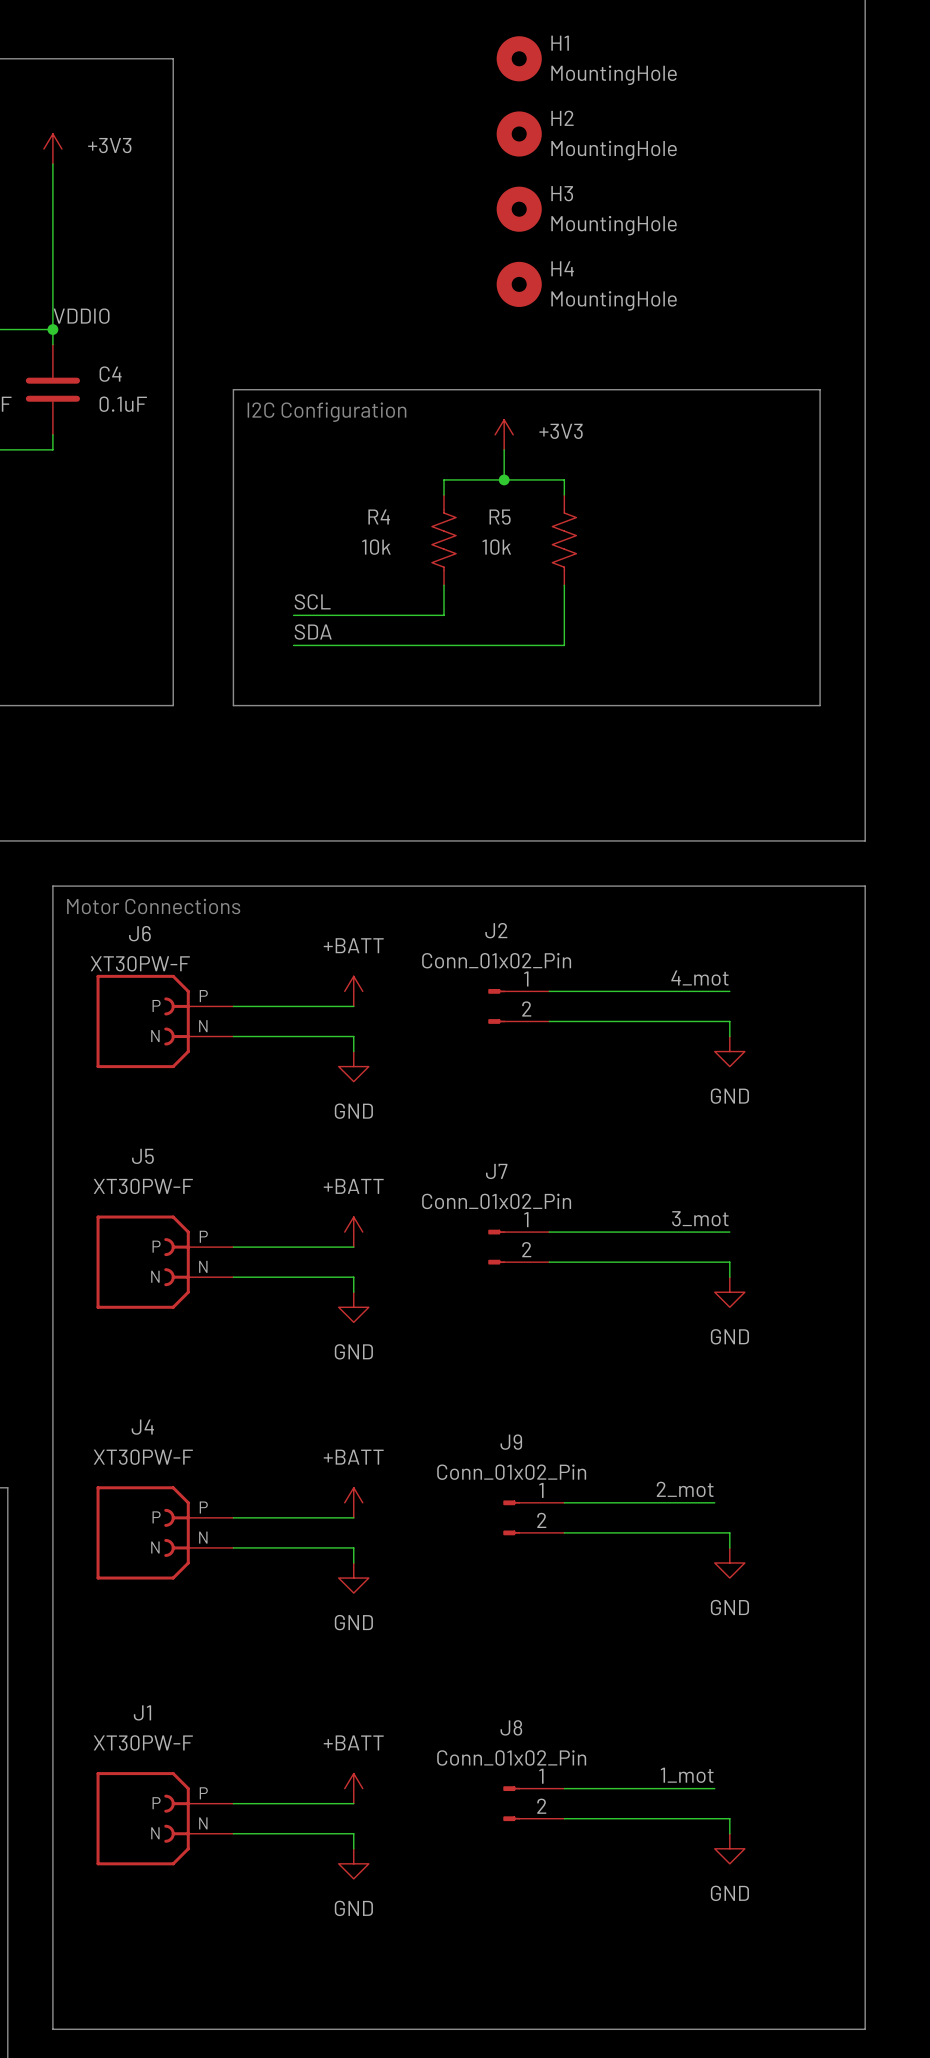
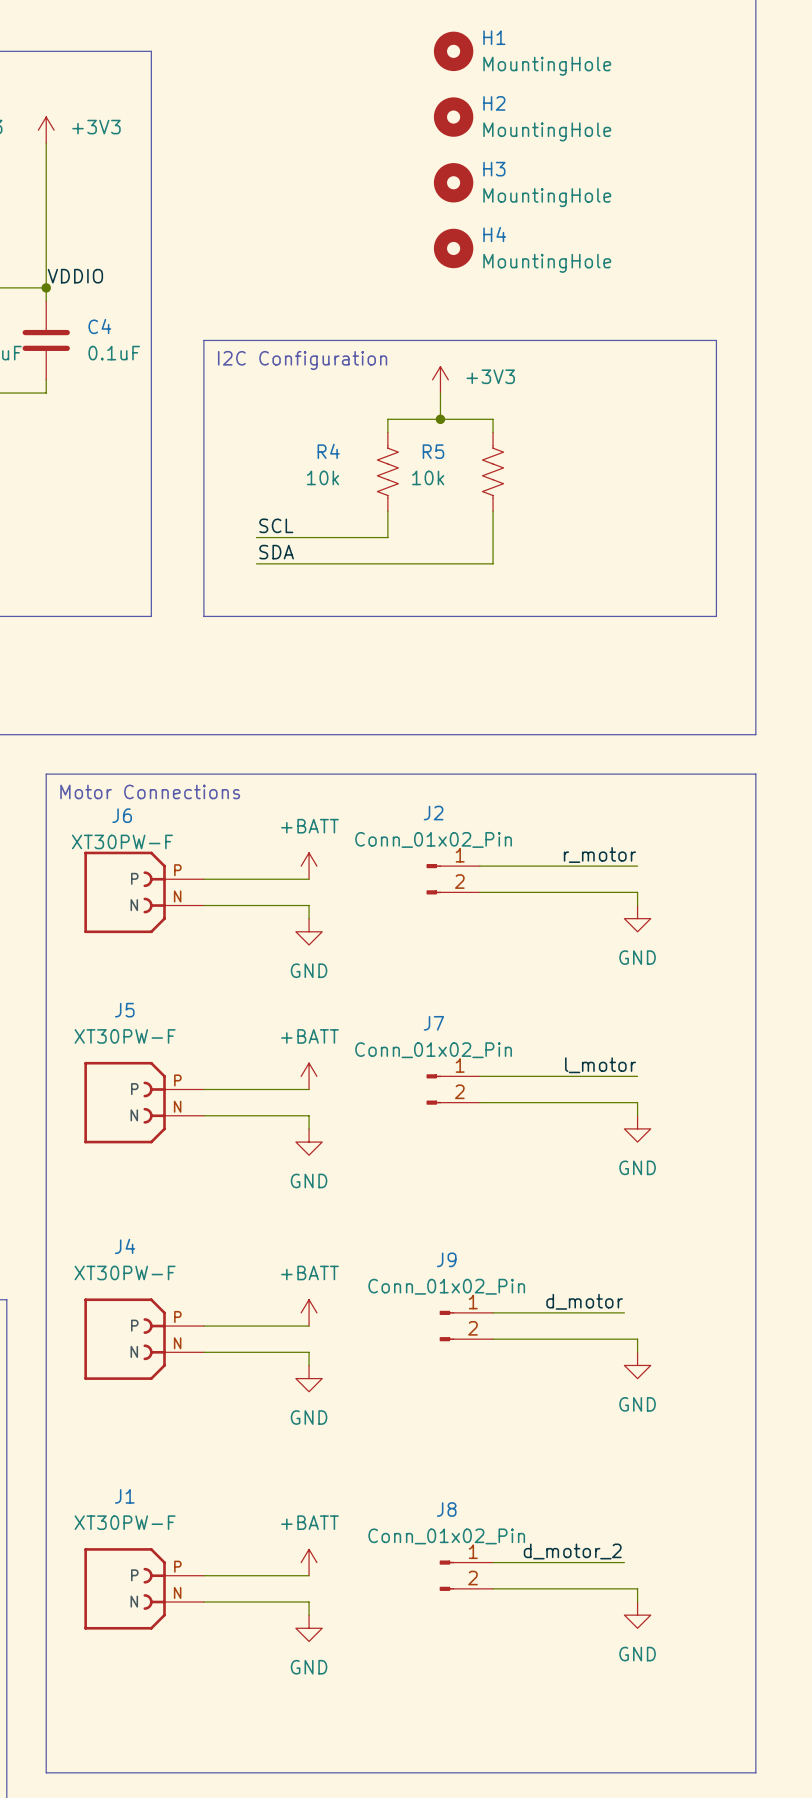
label: 4_mot (699, 978) -> r_motor (599, 855)
label: 3_mot (700, 1218) -> l_motor (600, 1065)
label: 2_mot (685, 1489) -> d_motor (584, 1301)
label: 1_mot (687, 1775) -> d_motor_2 (572, 1551)

